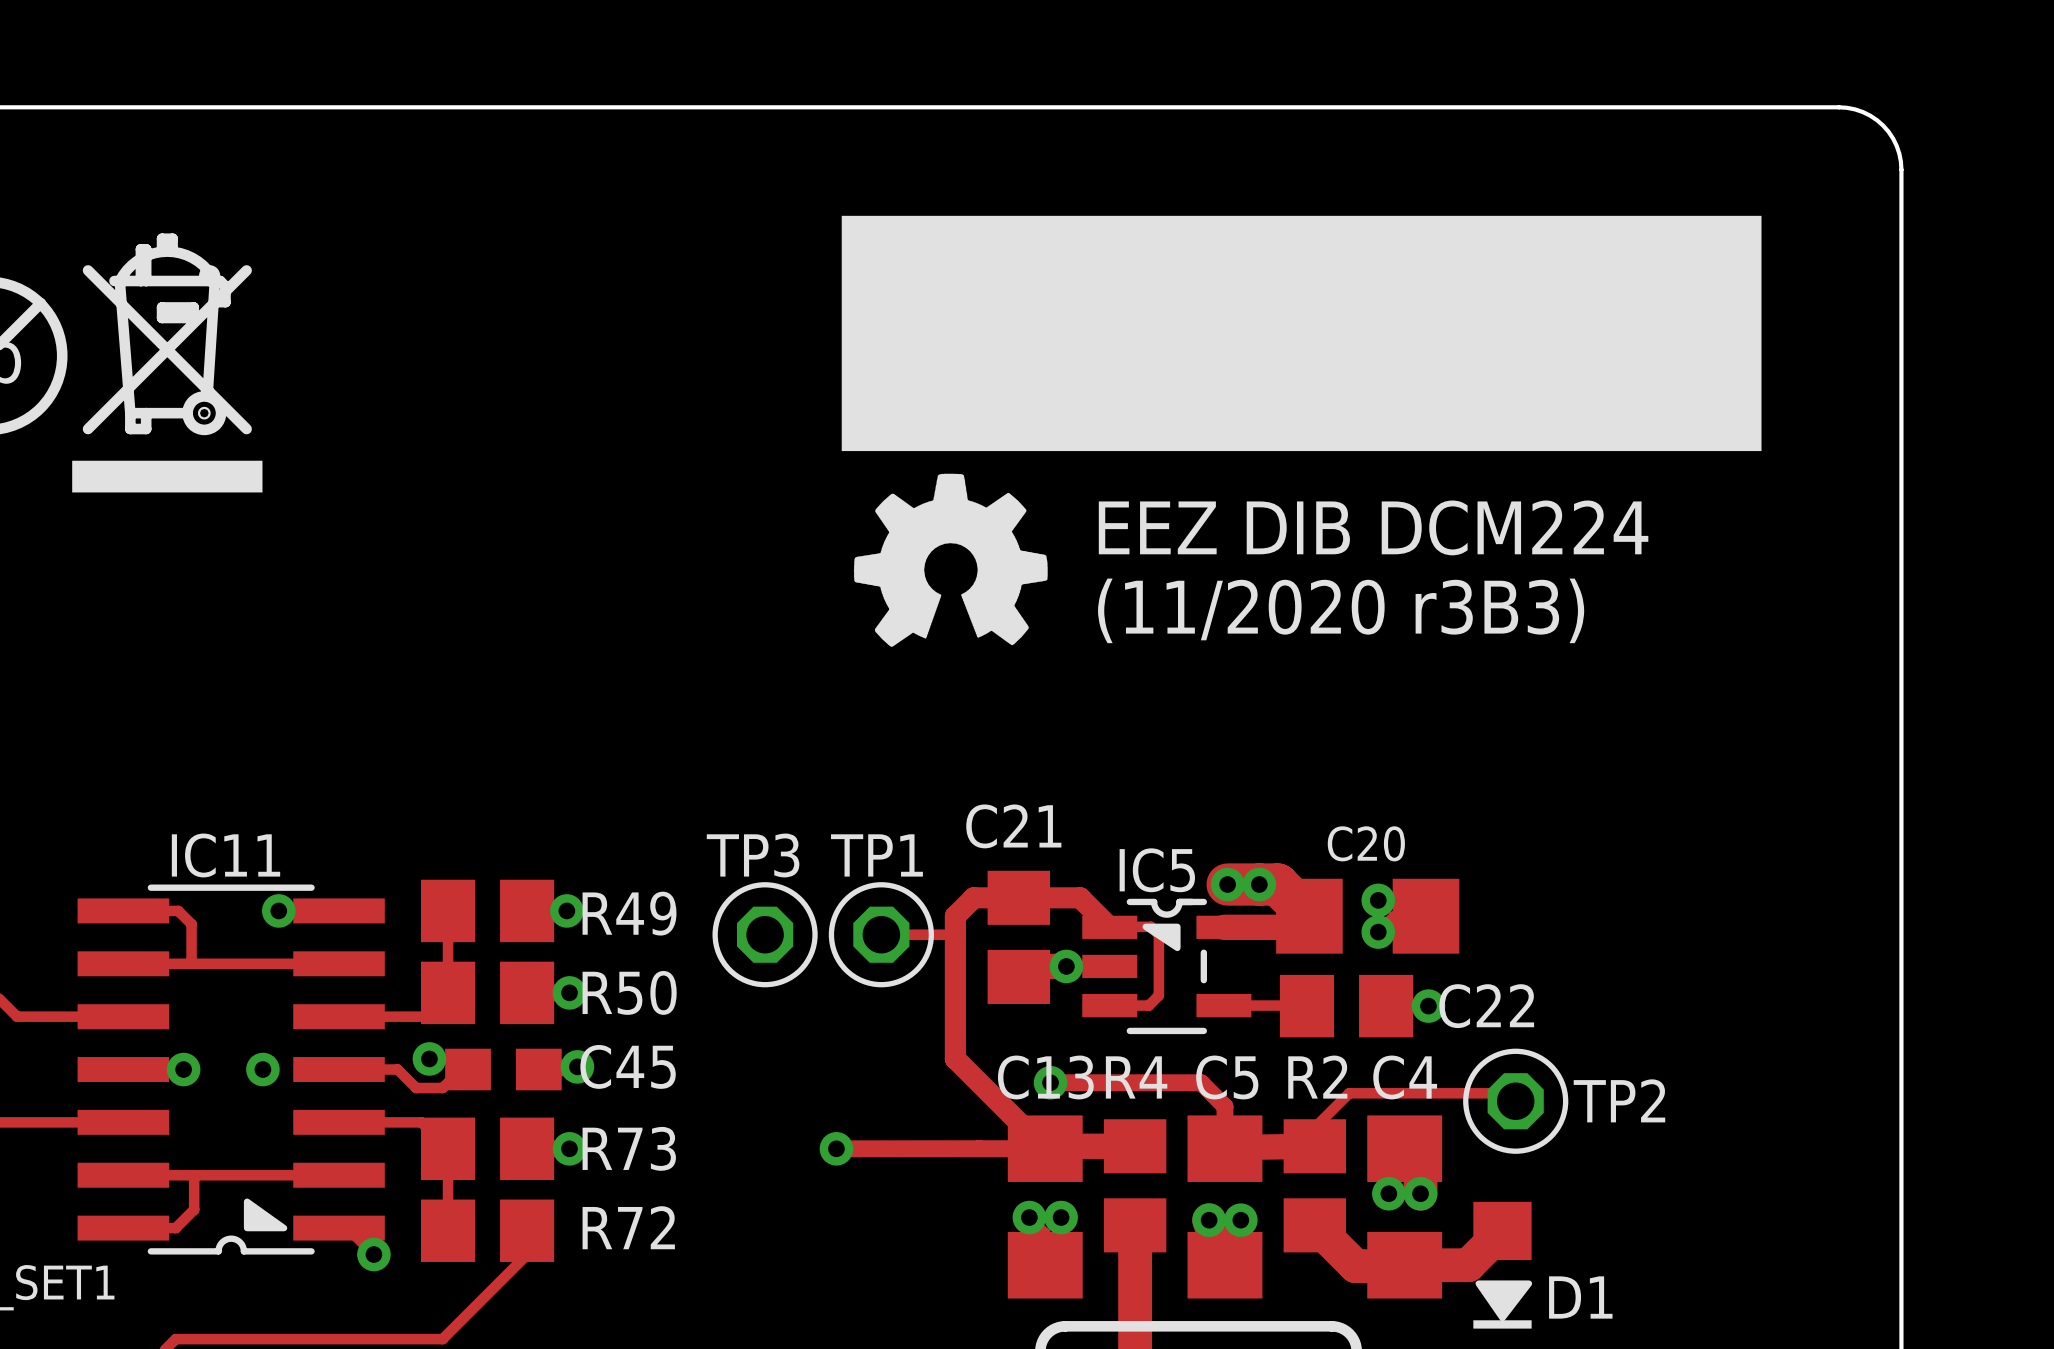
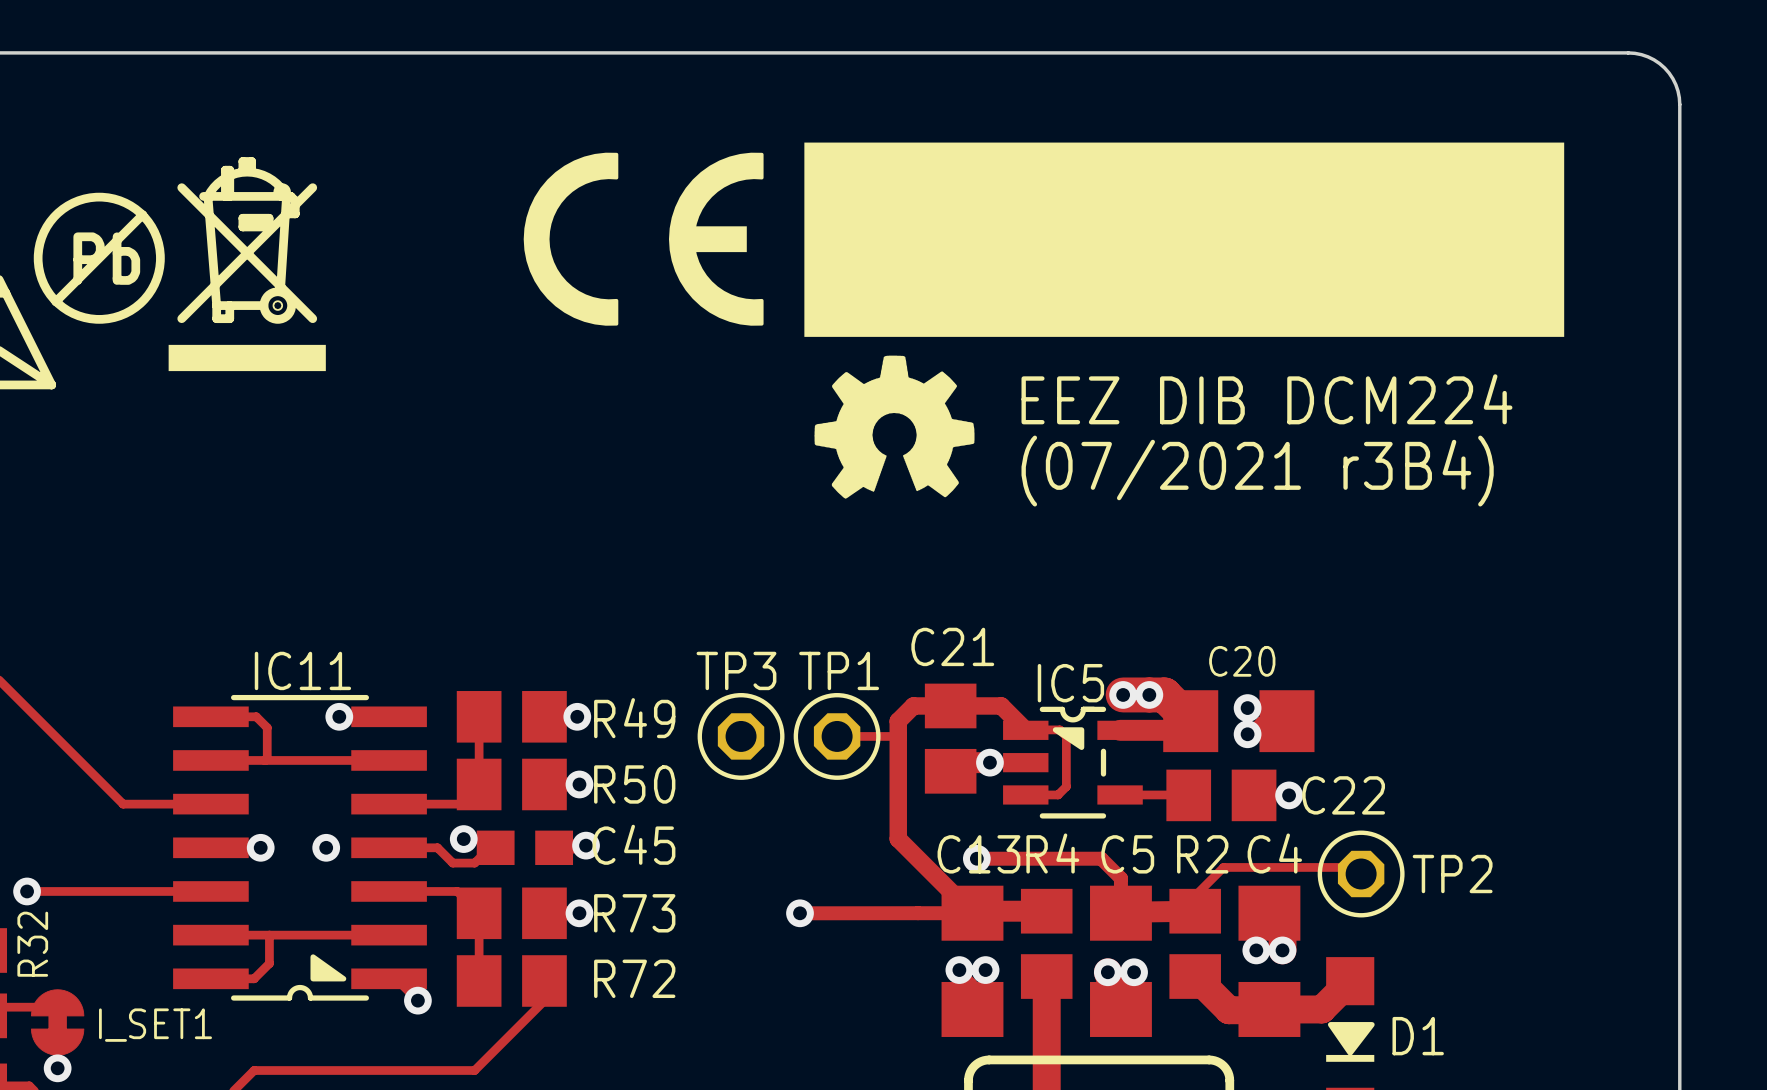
drawing: none -> [523, 152, 764, 326]
text: (11/2020 r3B3) (1341, 610) -> (07/2021 r3B4) (1257, 471)

